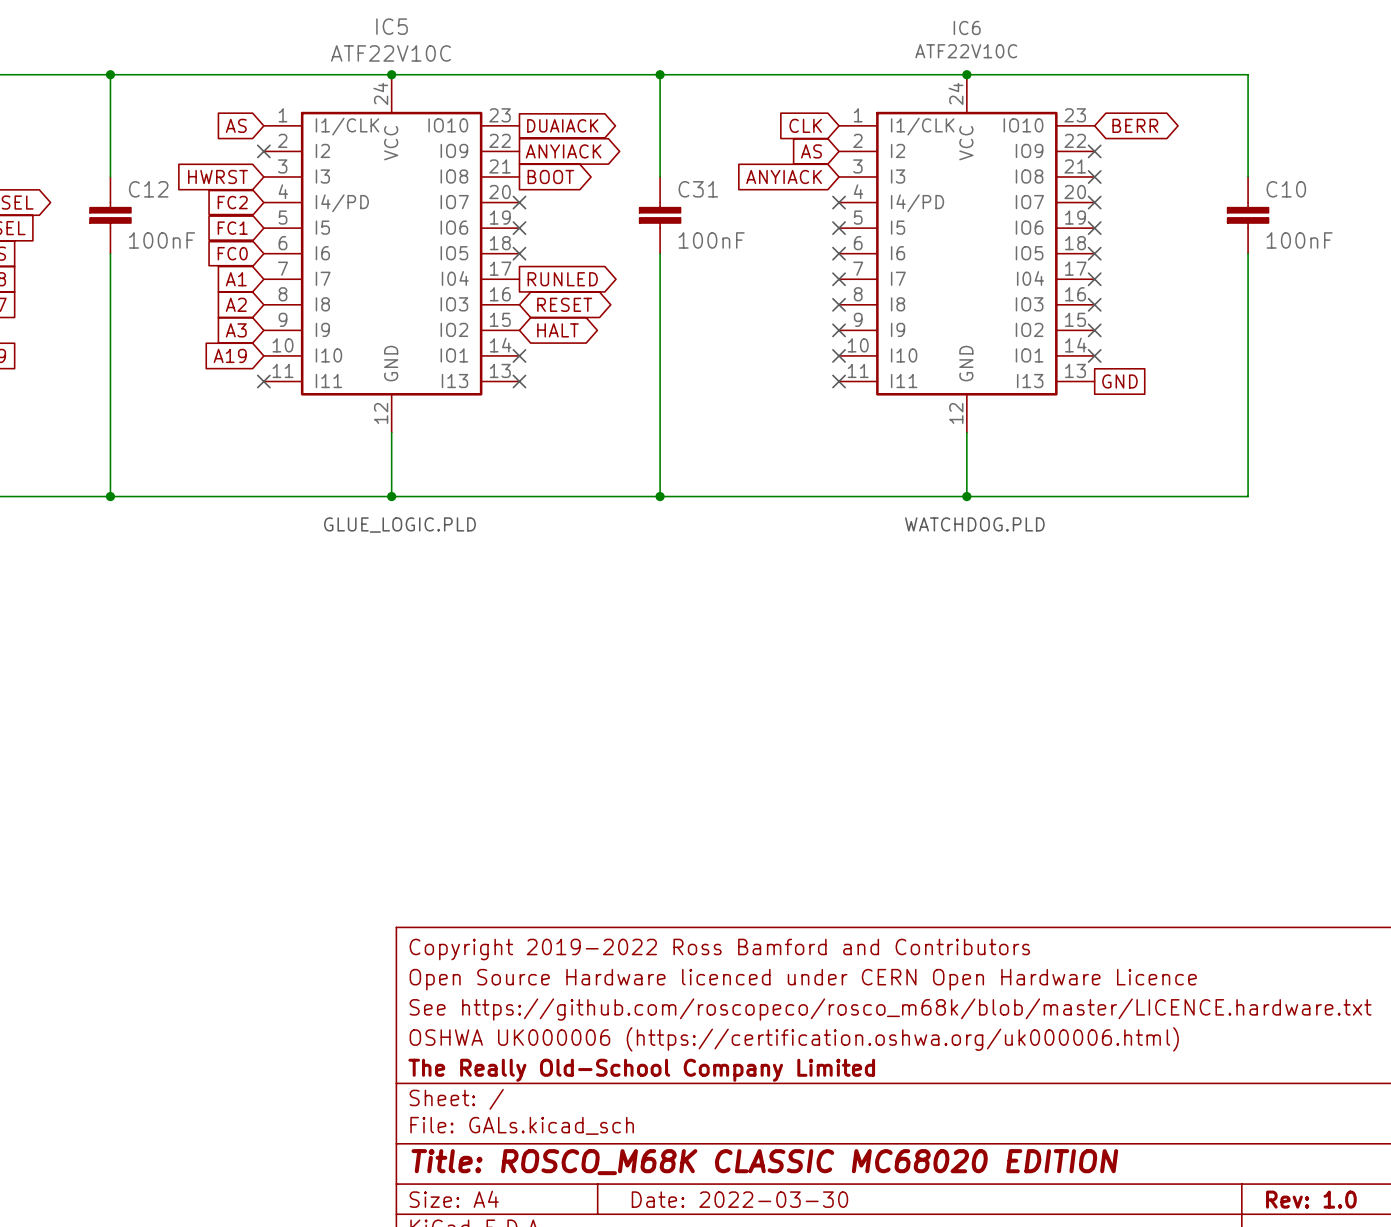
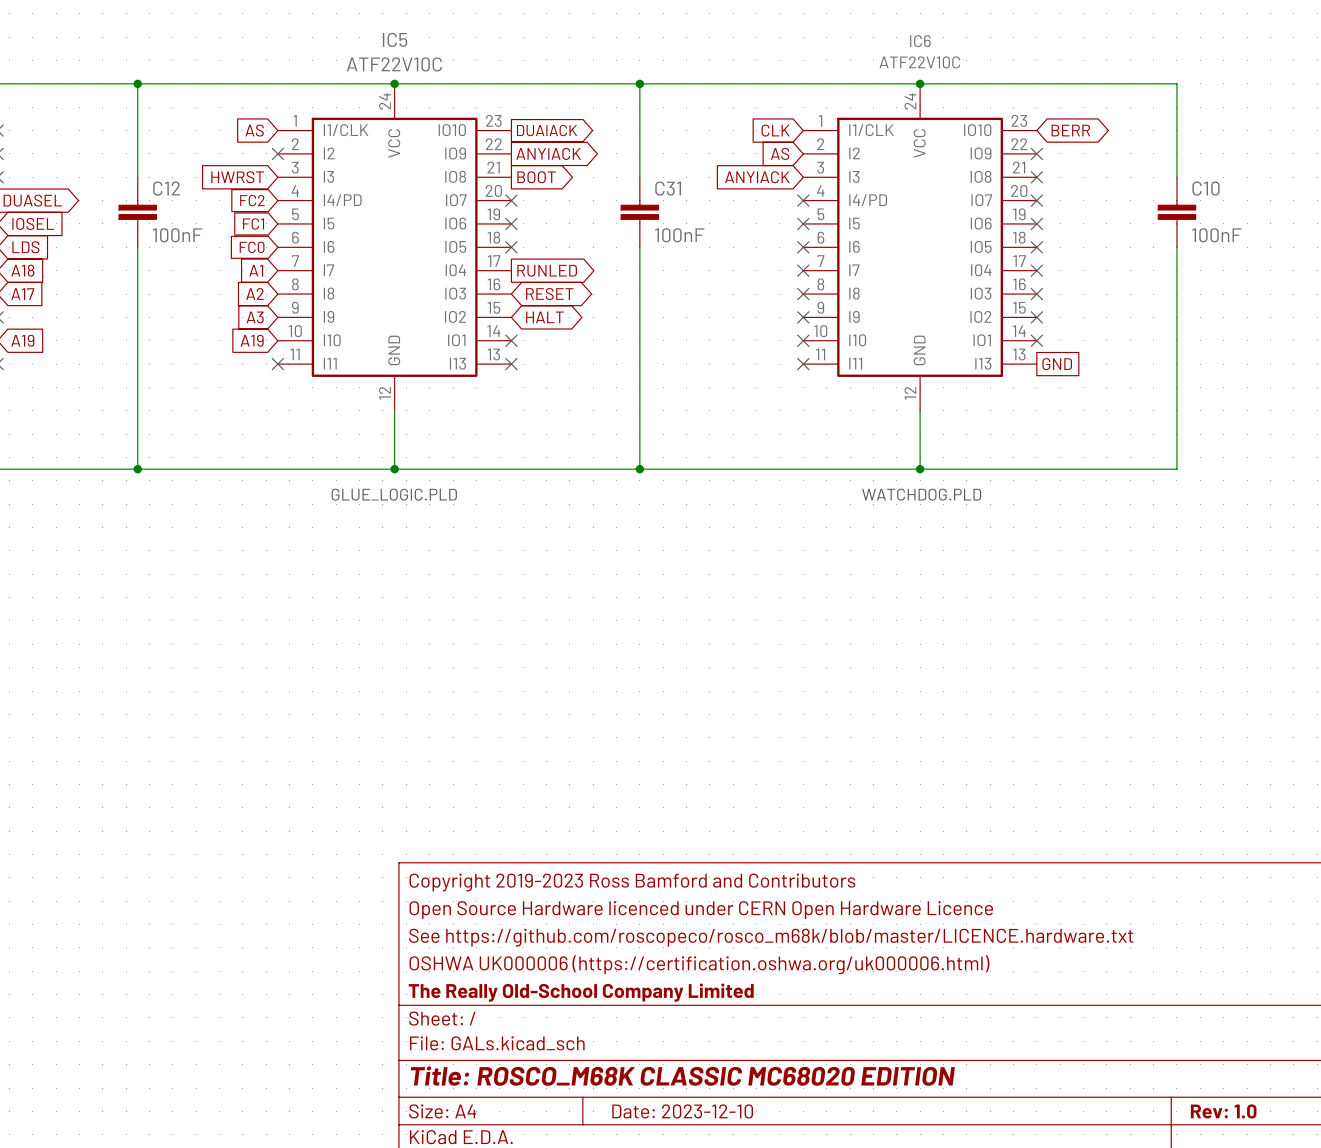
title block: Copyright 2019-2022 Ross Bamford and Contributors (719, 949) -> Copyright 2019-2023 Ross Bamford and Contributors (632, 882)
title block: Date: 2022-03-30 (739, 1199) -> Date: 2023-12-10 (682, 1111)

